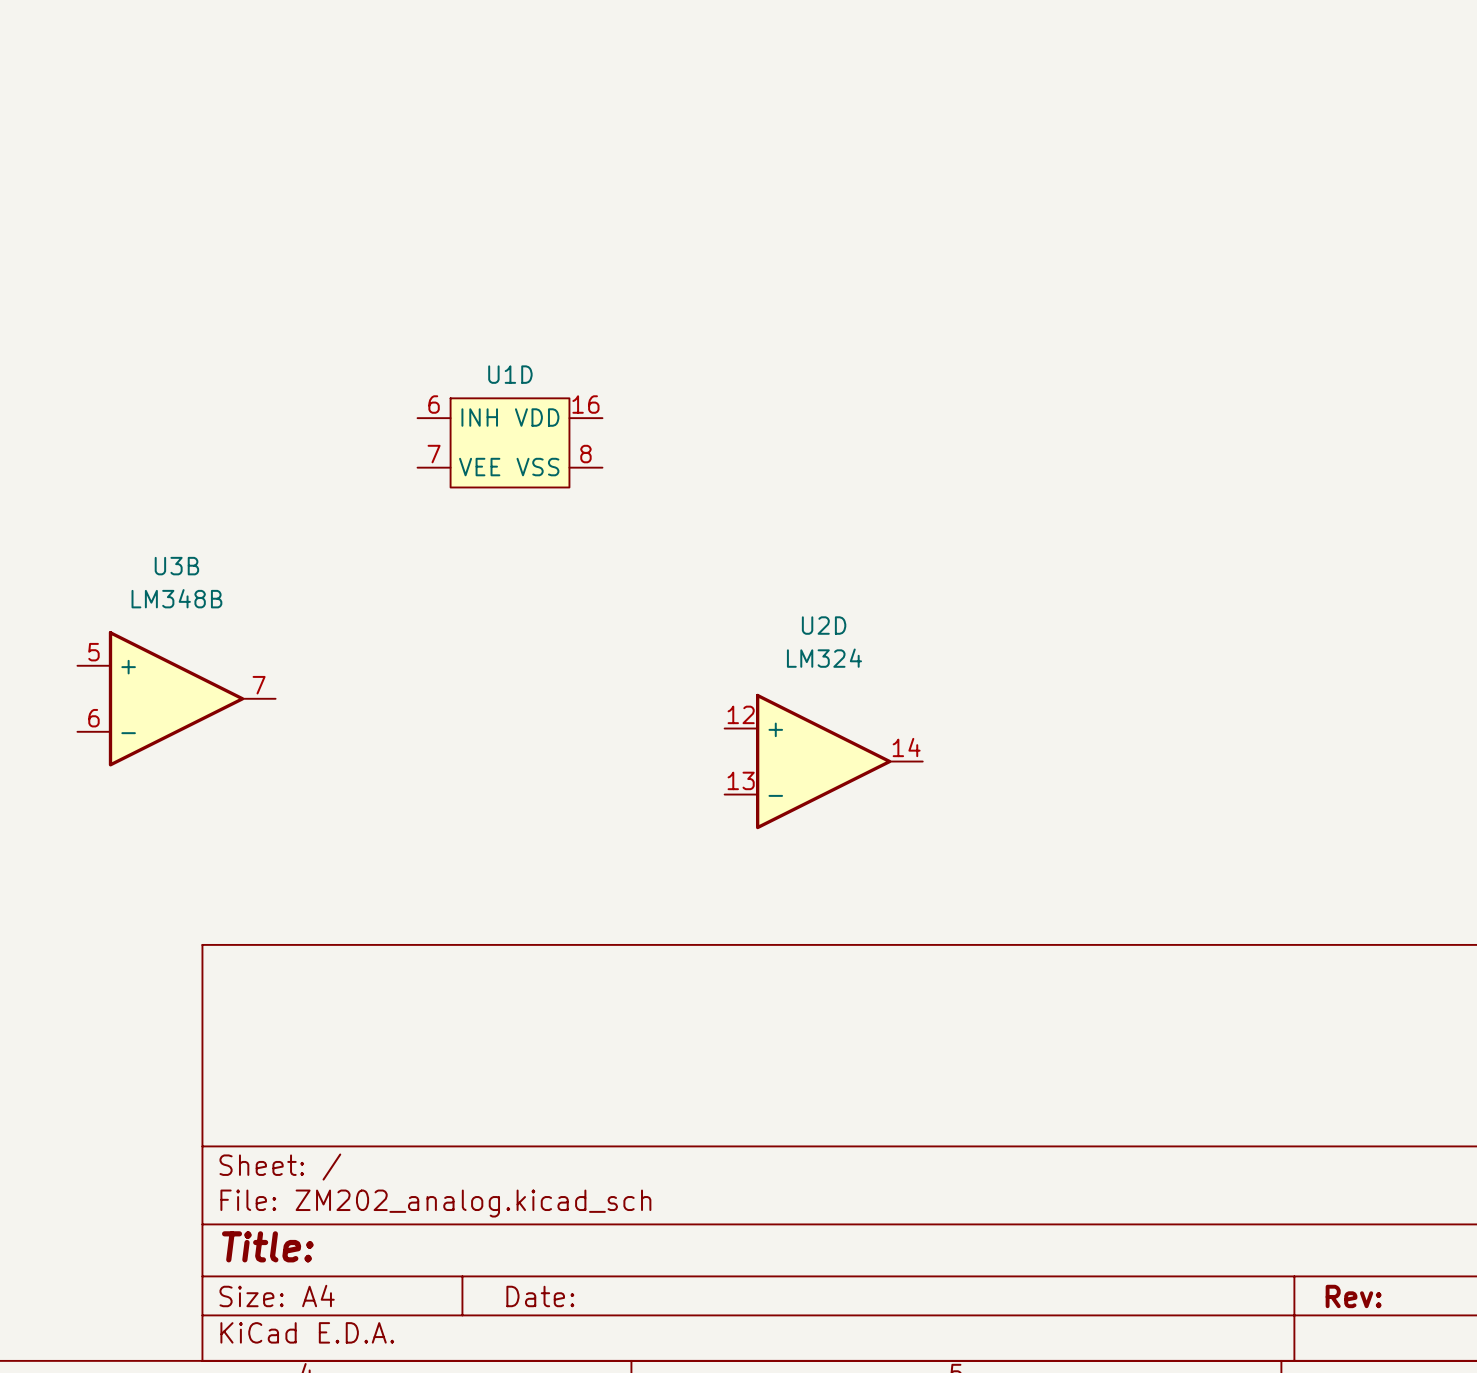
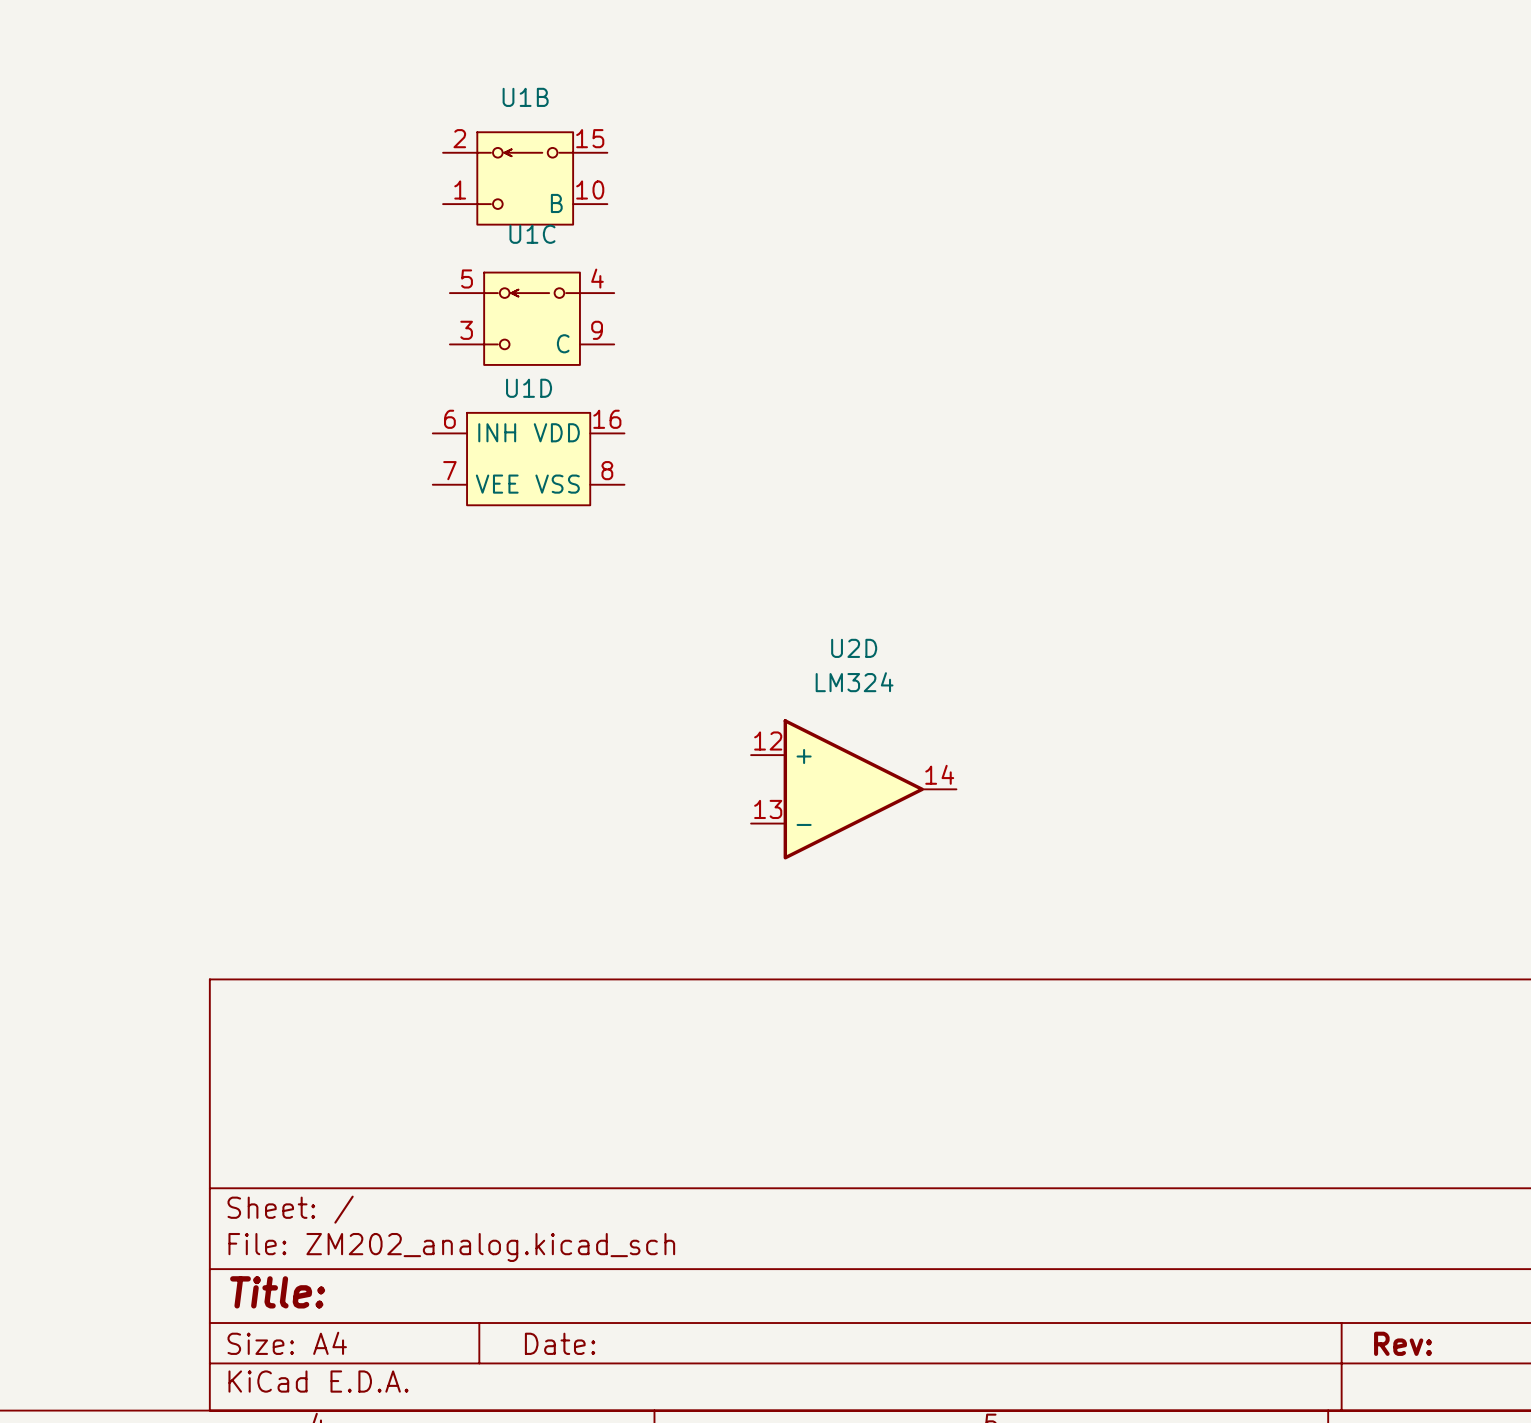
U1B: none -> (525, 178)
U1C: none -> (532, 318)
U3B: LM348B (176, 698) -> none

